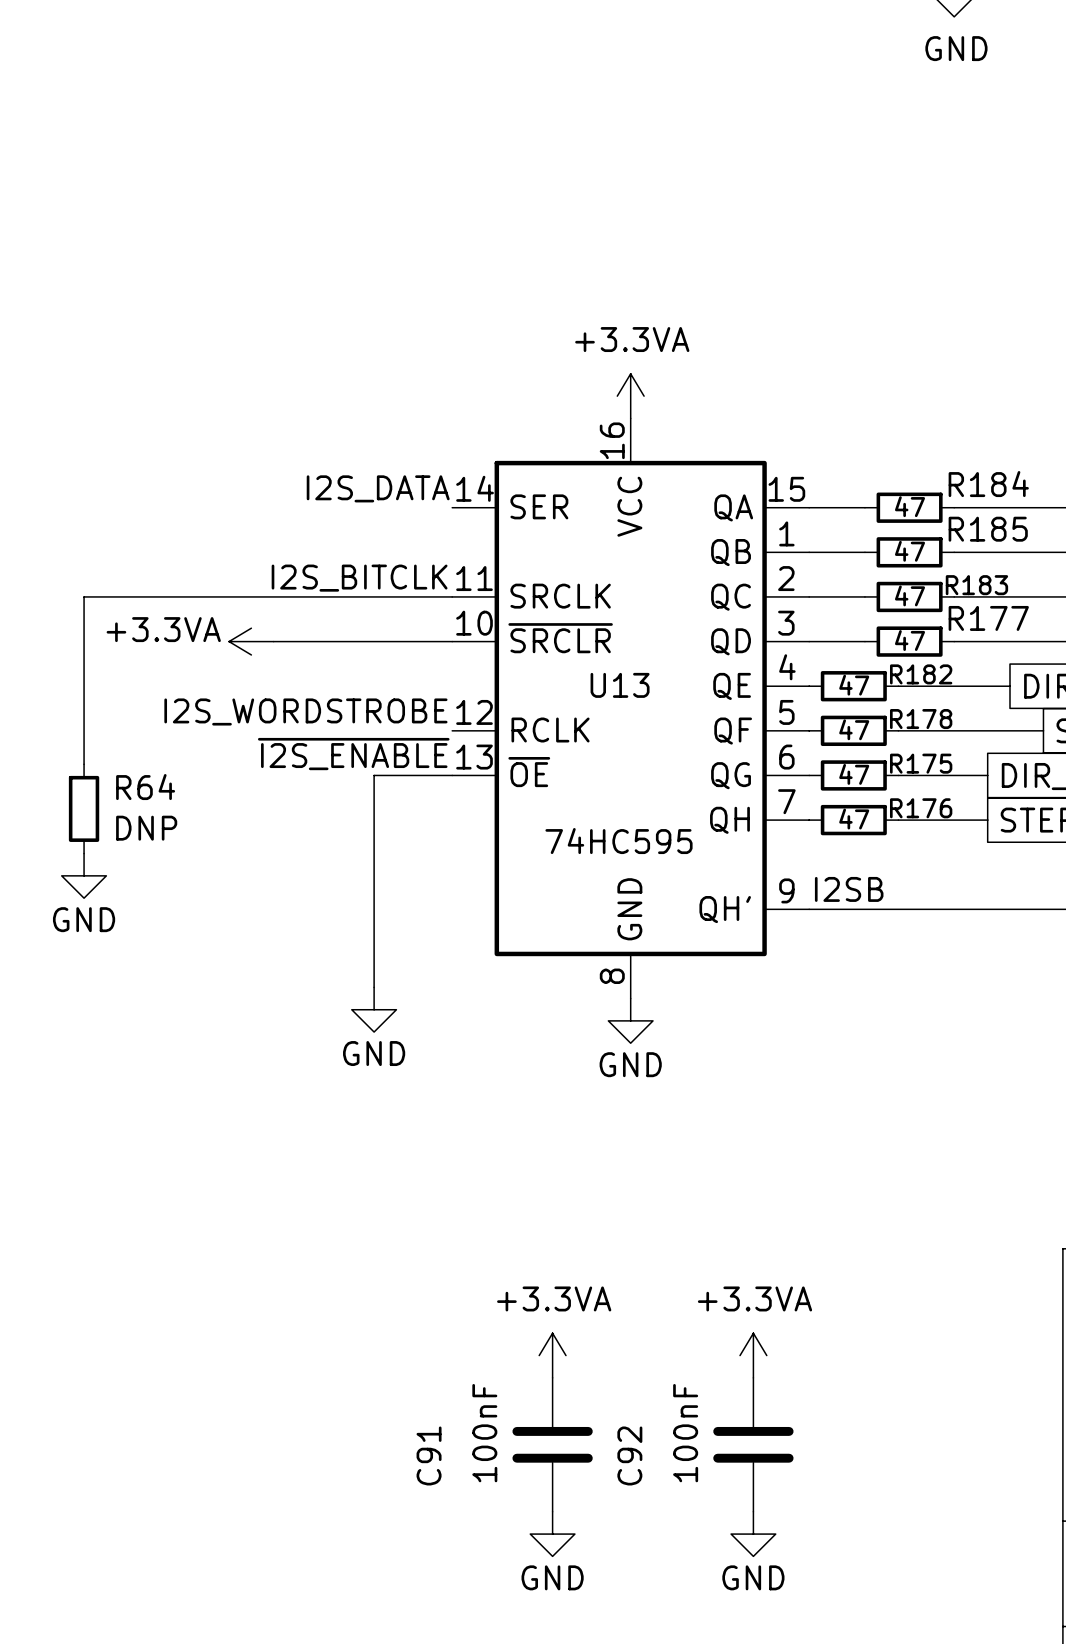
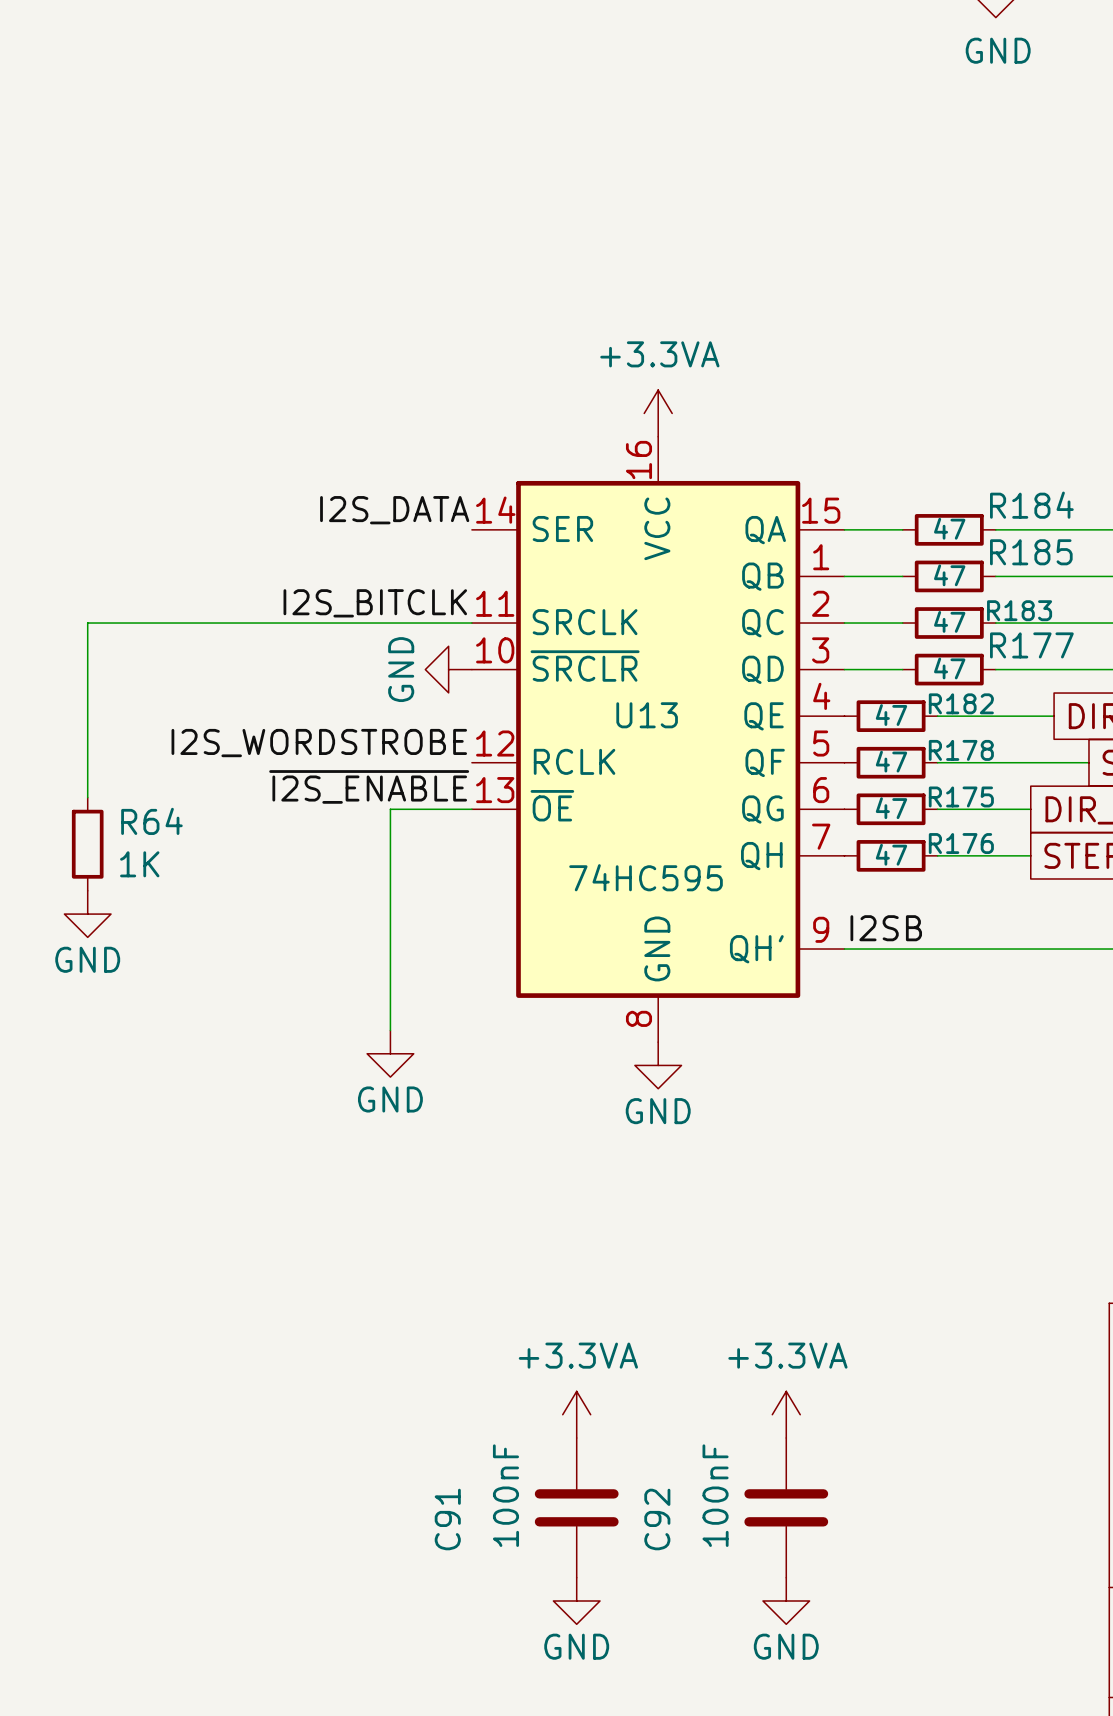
power symbol: +3.3VA (251, 641) -> none
wire: (273, 641) (452, 641) -> none
power symbol: none -> GND (448, 669)
R64 value: DNP (146, 828) -> 1K (139, 864)

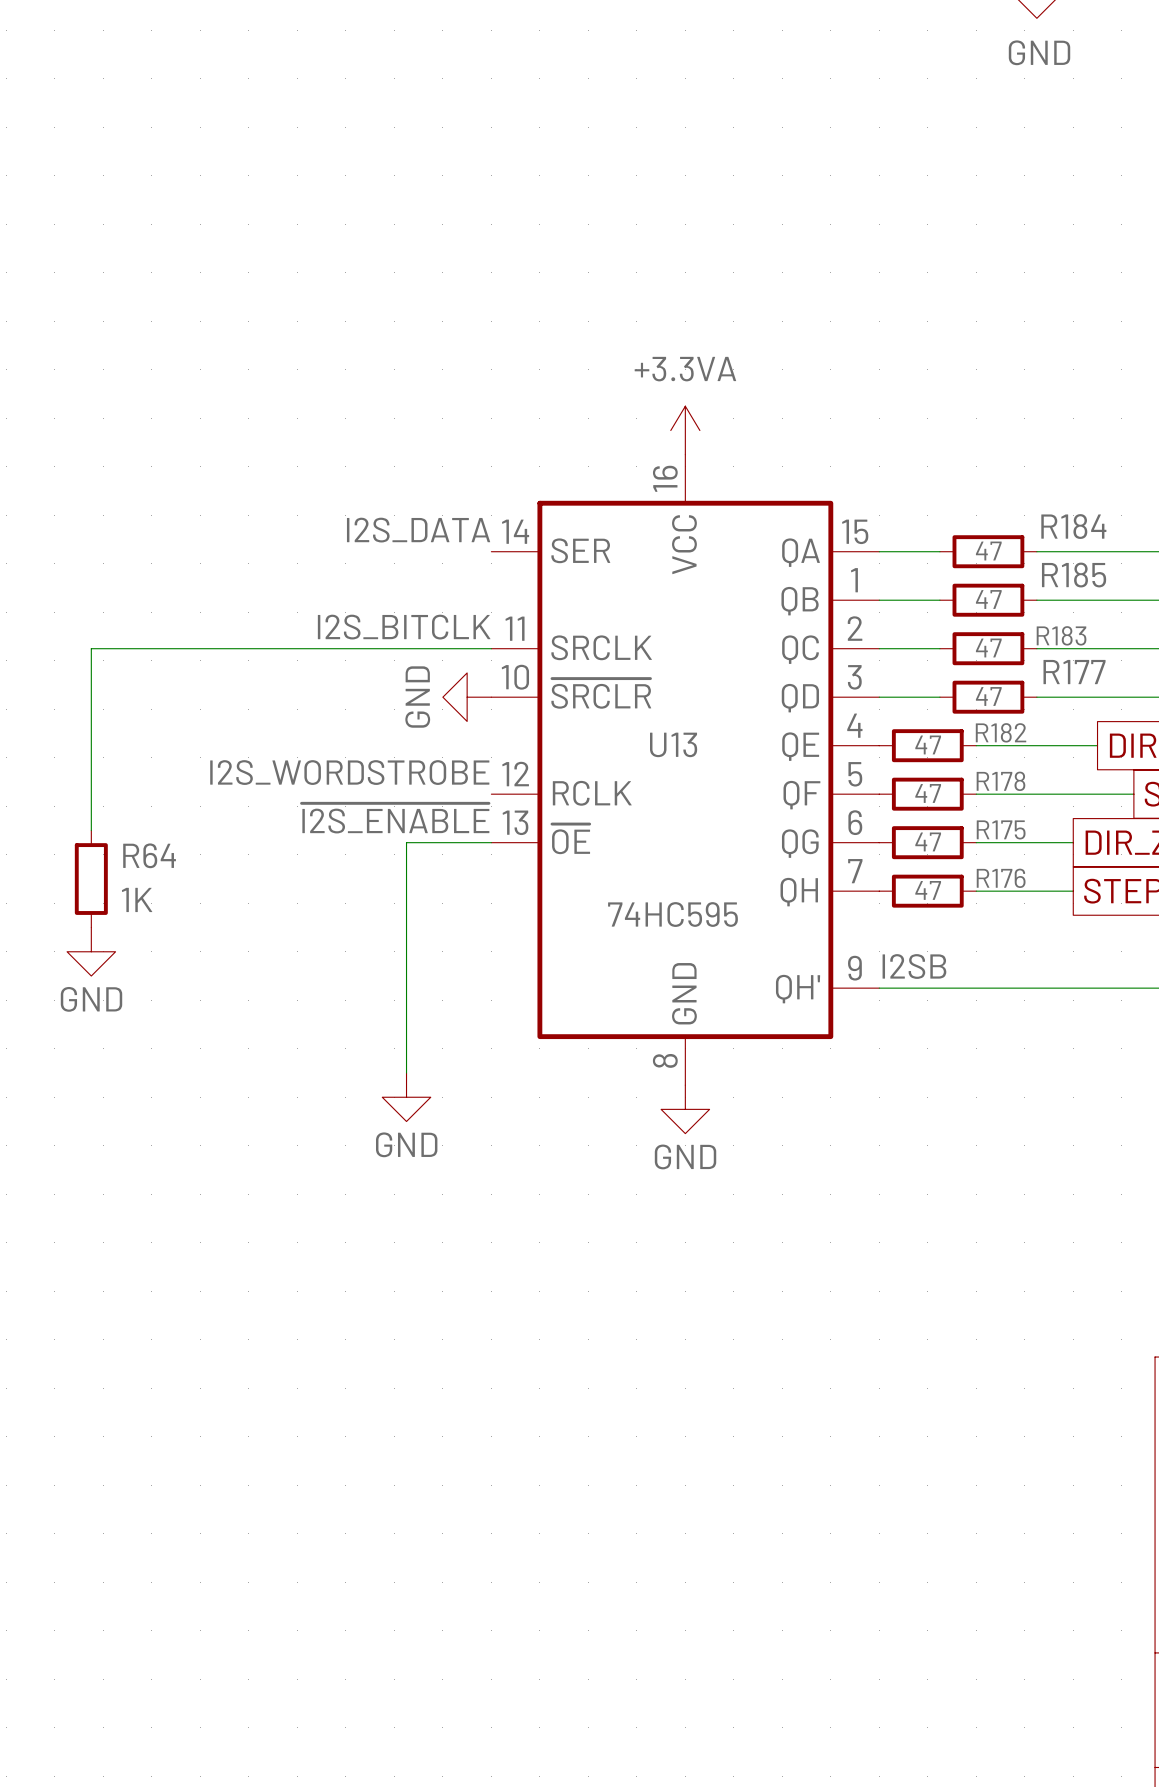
power symbol: +3.3VA (576, 1414) -> none
power symbol: +3.3VA (786, 1414) -> none
C91: 100nF (576, 1507) -> none
C92: 100nF (786, 1507) -> none
power symbol: GND (576, 1601) -> none
power symbol: GND (786, 1601) -> none

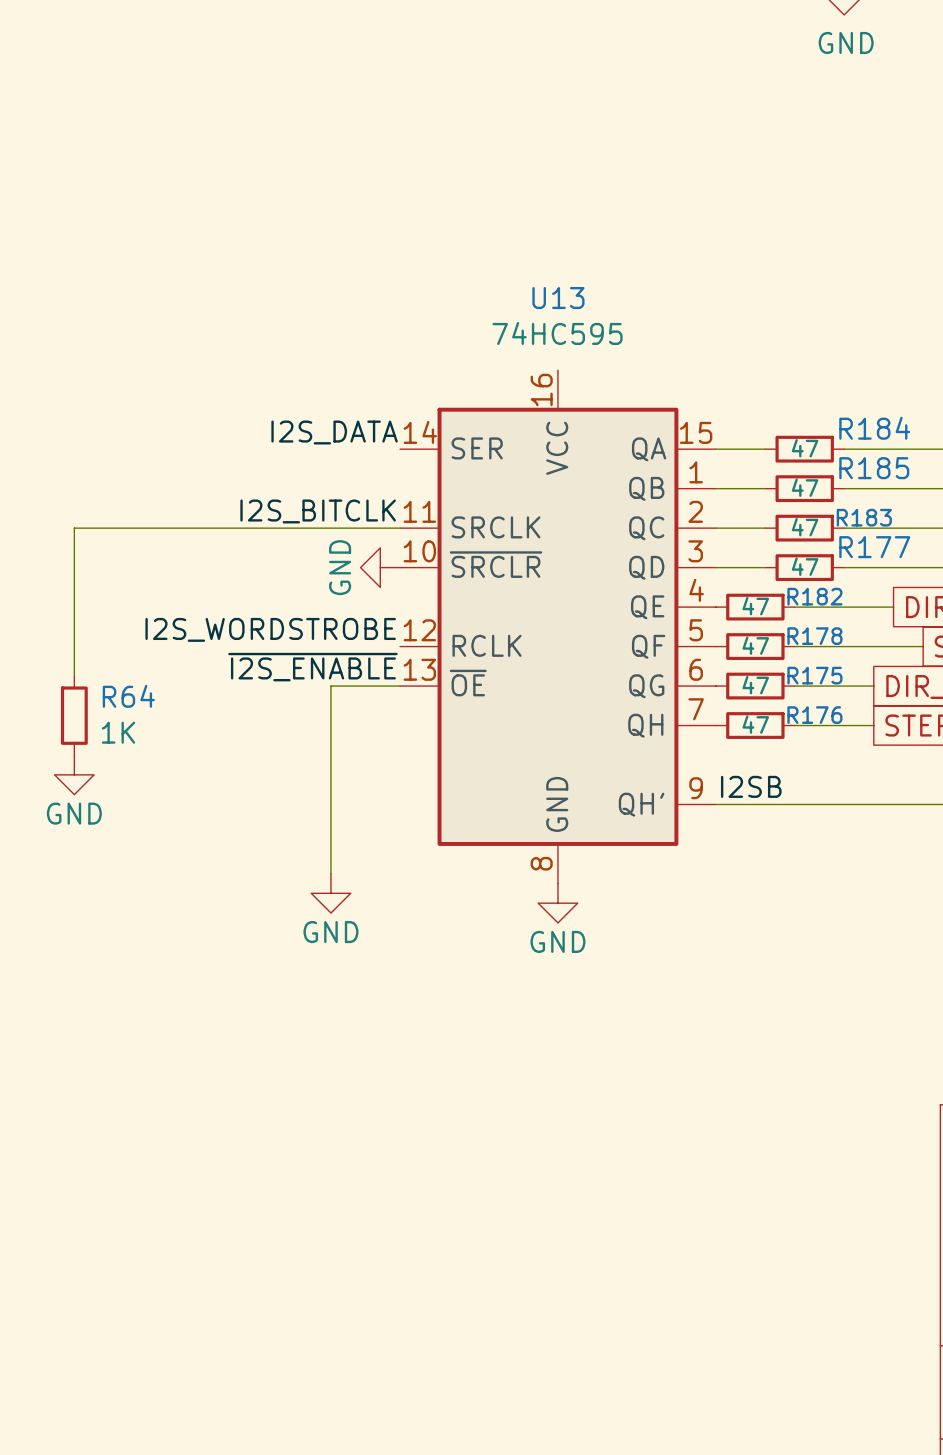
power symbol: +3.3VA (685, 430) -> none
U13 name position: U13 (673, 744) -> U13 (558, 298)
U13 value position: 74HC595 (672, 914) -> 74HC595 (557, 333)

